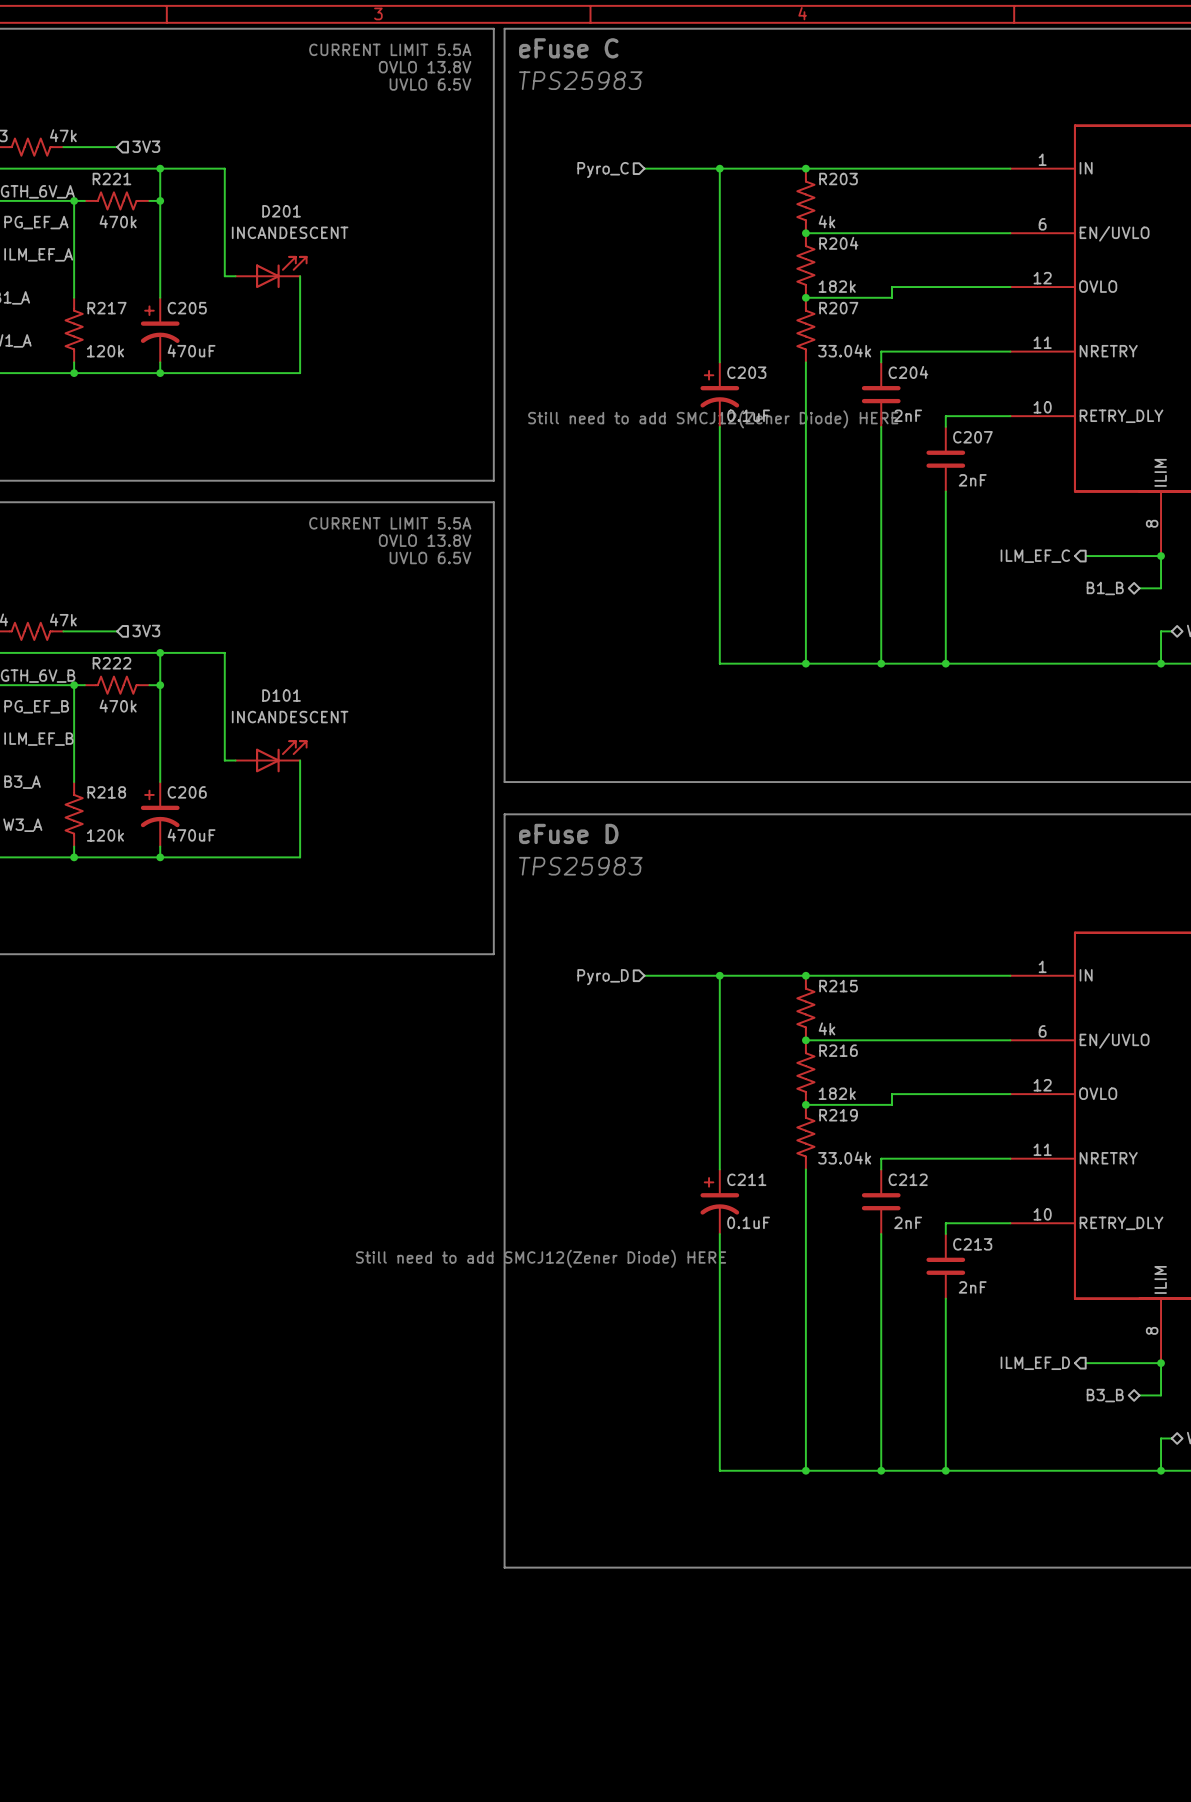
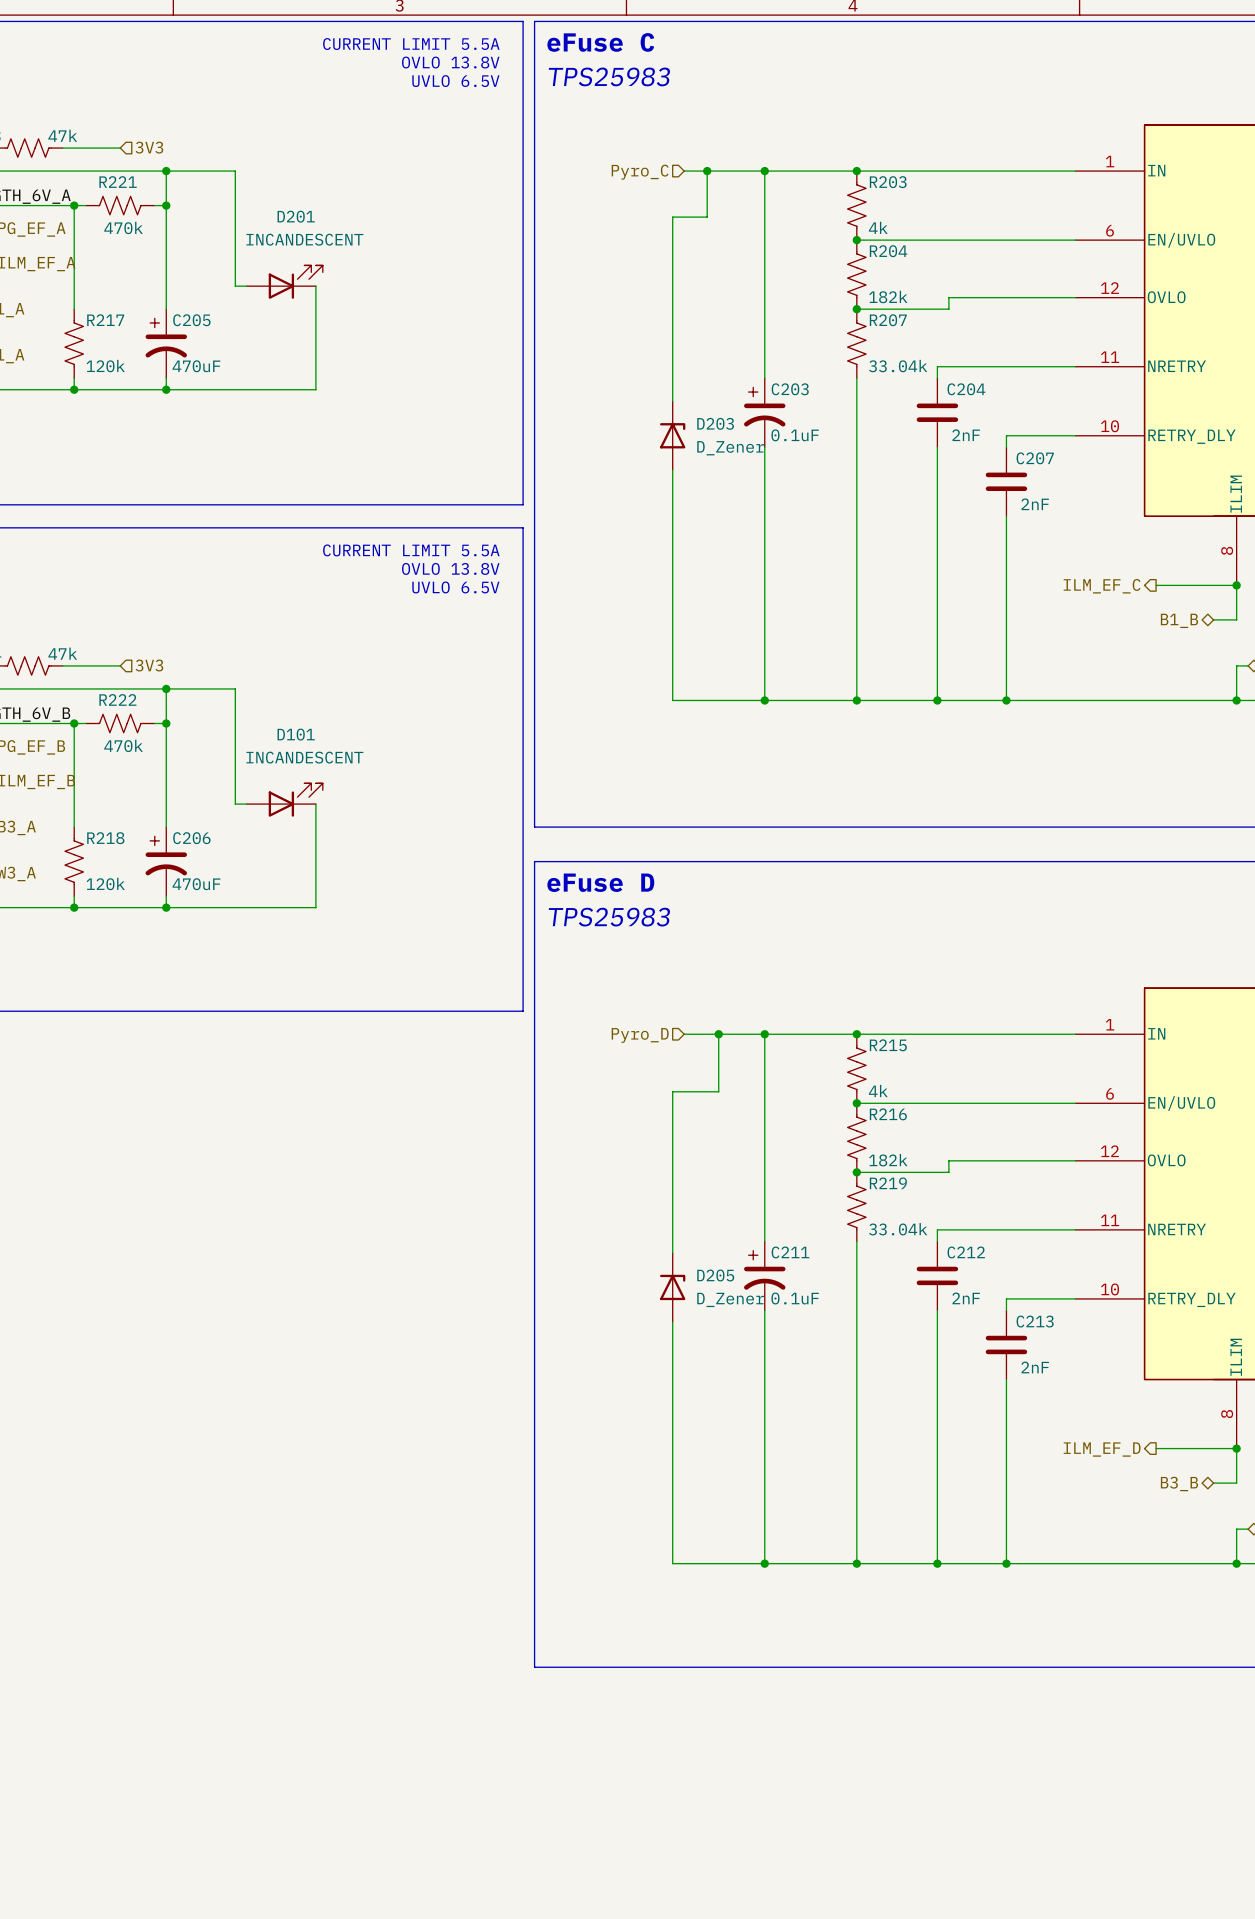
wire: none -> (707, 171) (707, 217) (672, 217) (672, 401)
junction: none -> (707, 171)
D203: none -> D_Zener (672, 435)
text: Still need to add SMCJ12(Zener Diode) HERE (713, 419) -> none
wire: none -> (672, 470) (672, 700) (764, 700)
junction: none -> (764, 700)
wire: none -> (718, 1034) (718, 1091) (672, 1091) (672, 1252)
junction: none -> (718, 1034)
D205: none -> D_Zener (672, 1287)
wire: none -> (672, 1321) (672, 1563) (764, 1563)
text: Still need to add SMCJ12(Zener Diode) HERE (541, 1258) -> none
junction: none -> (764, 1563)

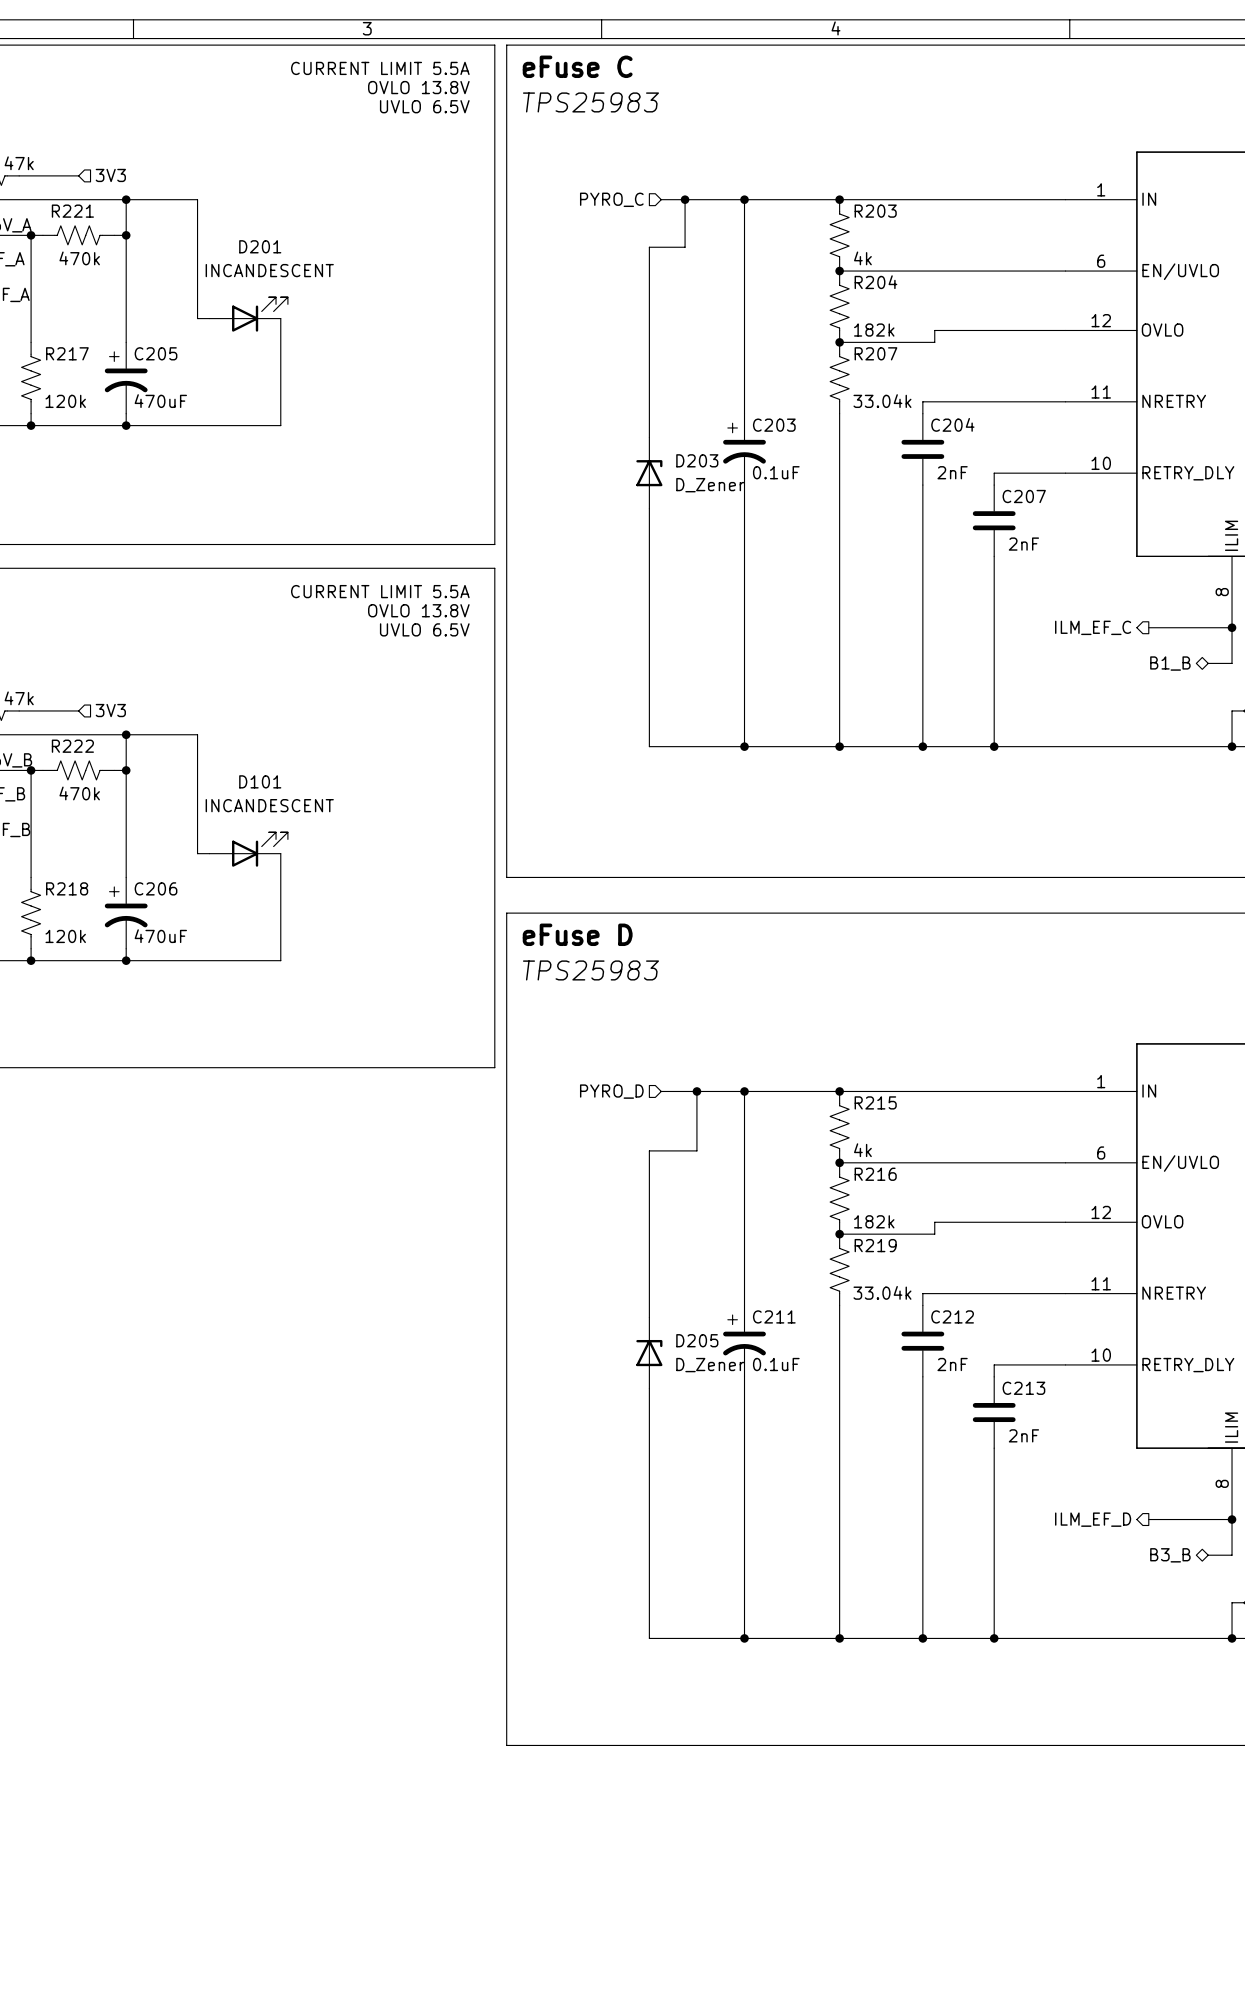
hierarchical label: Pyro_C (640, 172) -> PYRO_C (611, 199)
hierarchical label: Pyro_D (640, 1035) -> PYRO_D (611, 1091)

